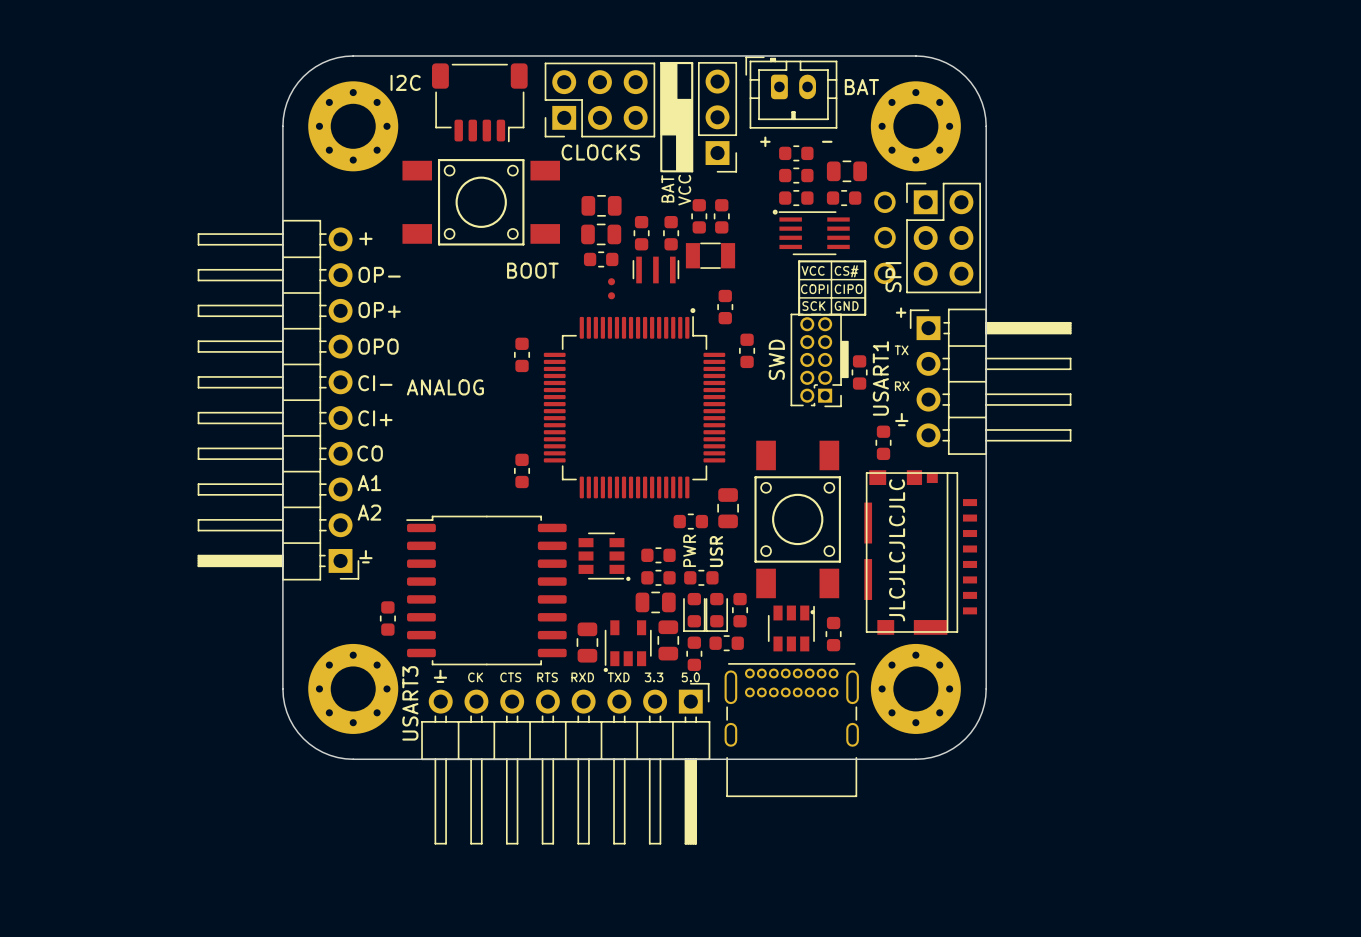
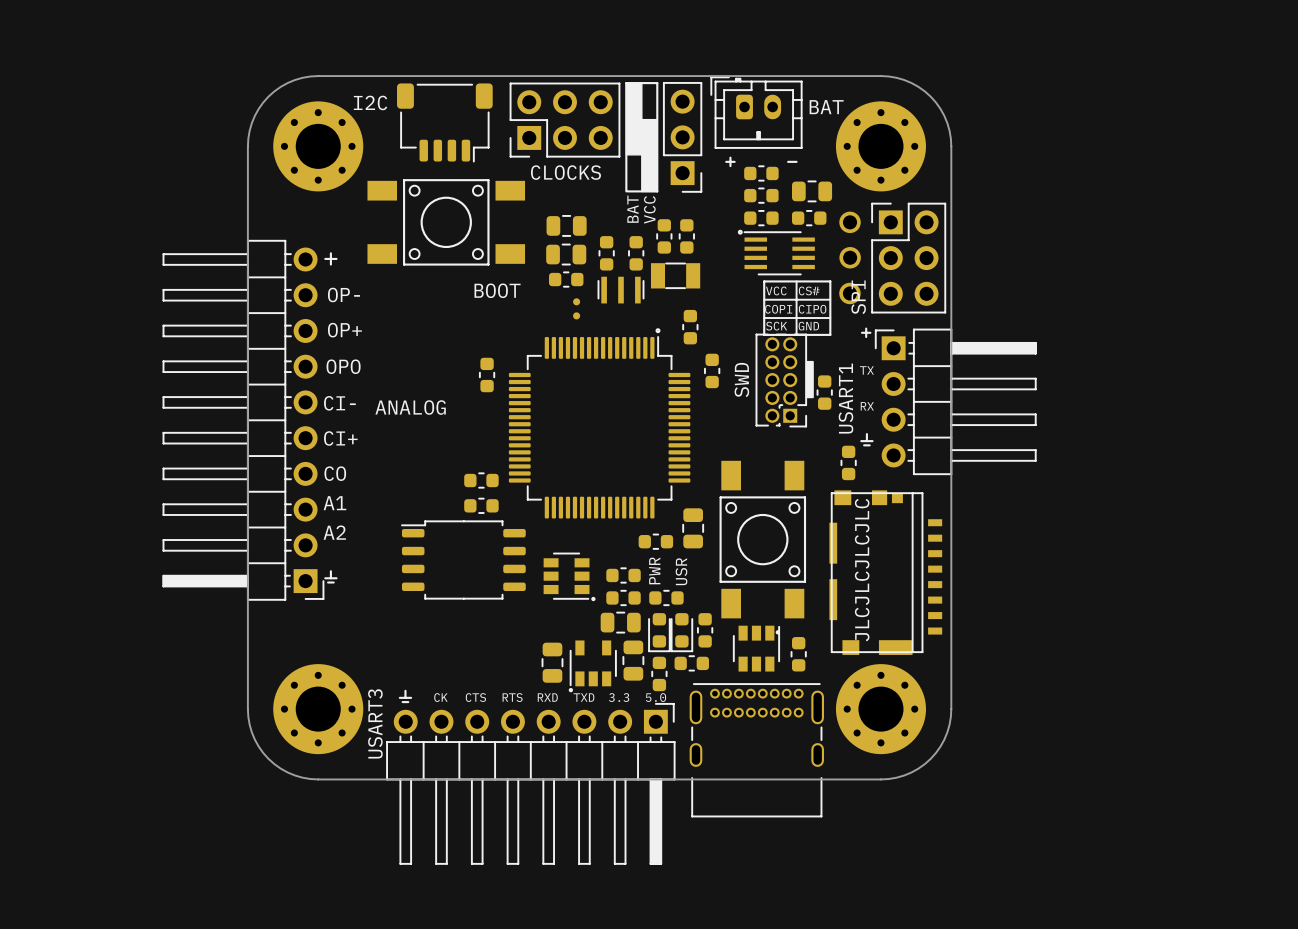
part: none -> (481, 480)
part: (522, 470) -> none
part: none -> (481, 505)
part: none -> (463, 559)
part: (486, 590) -> none
part: (387, 618) -> none

